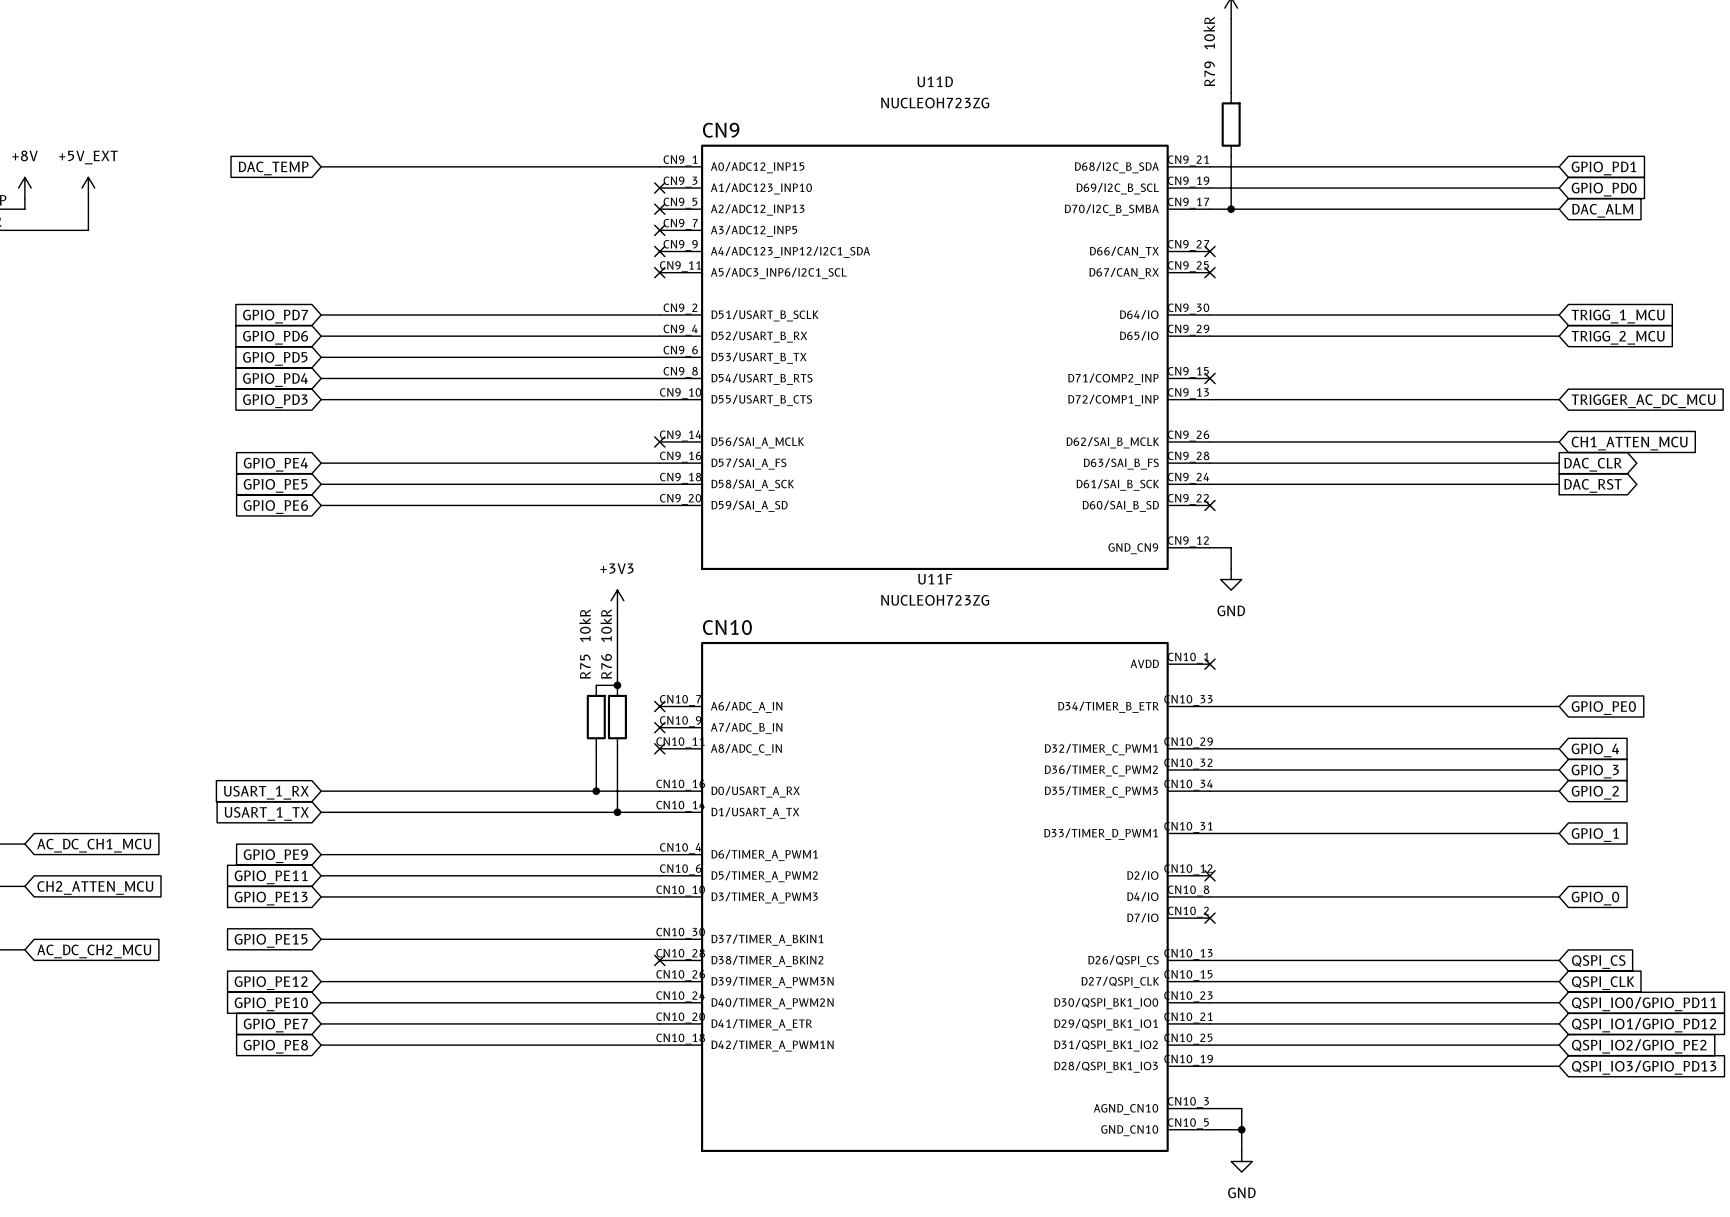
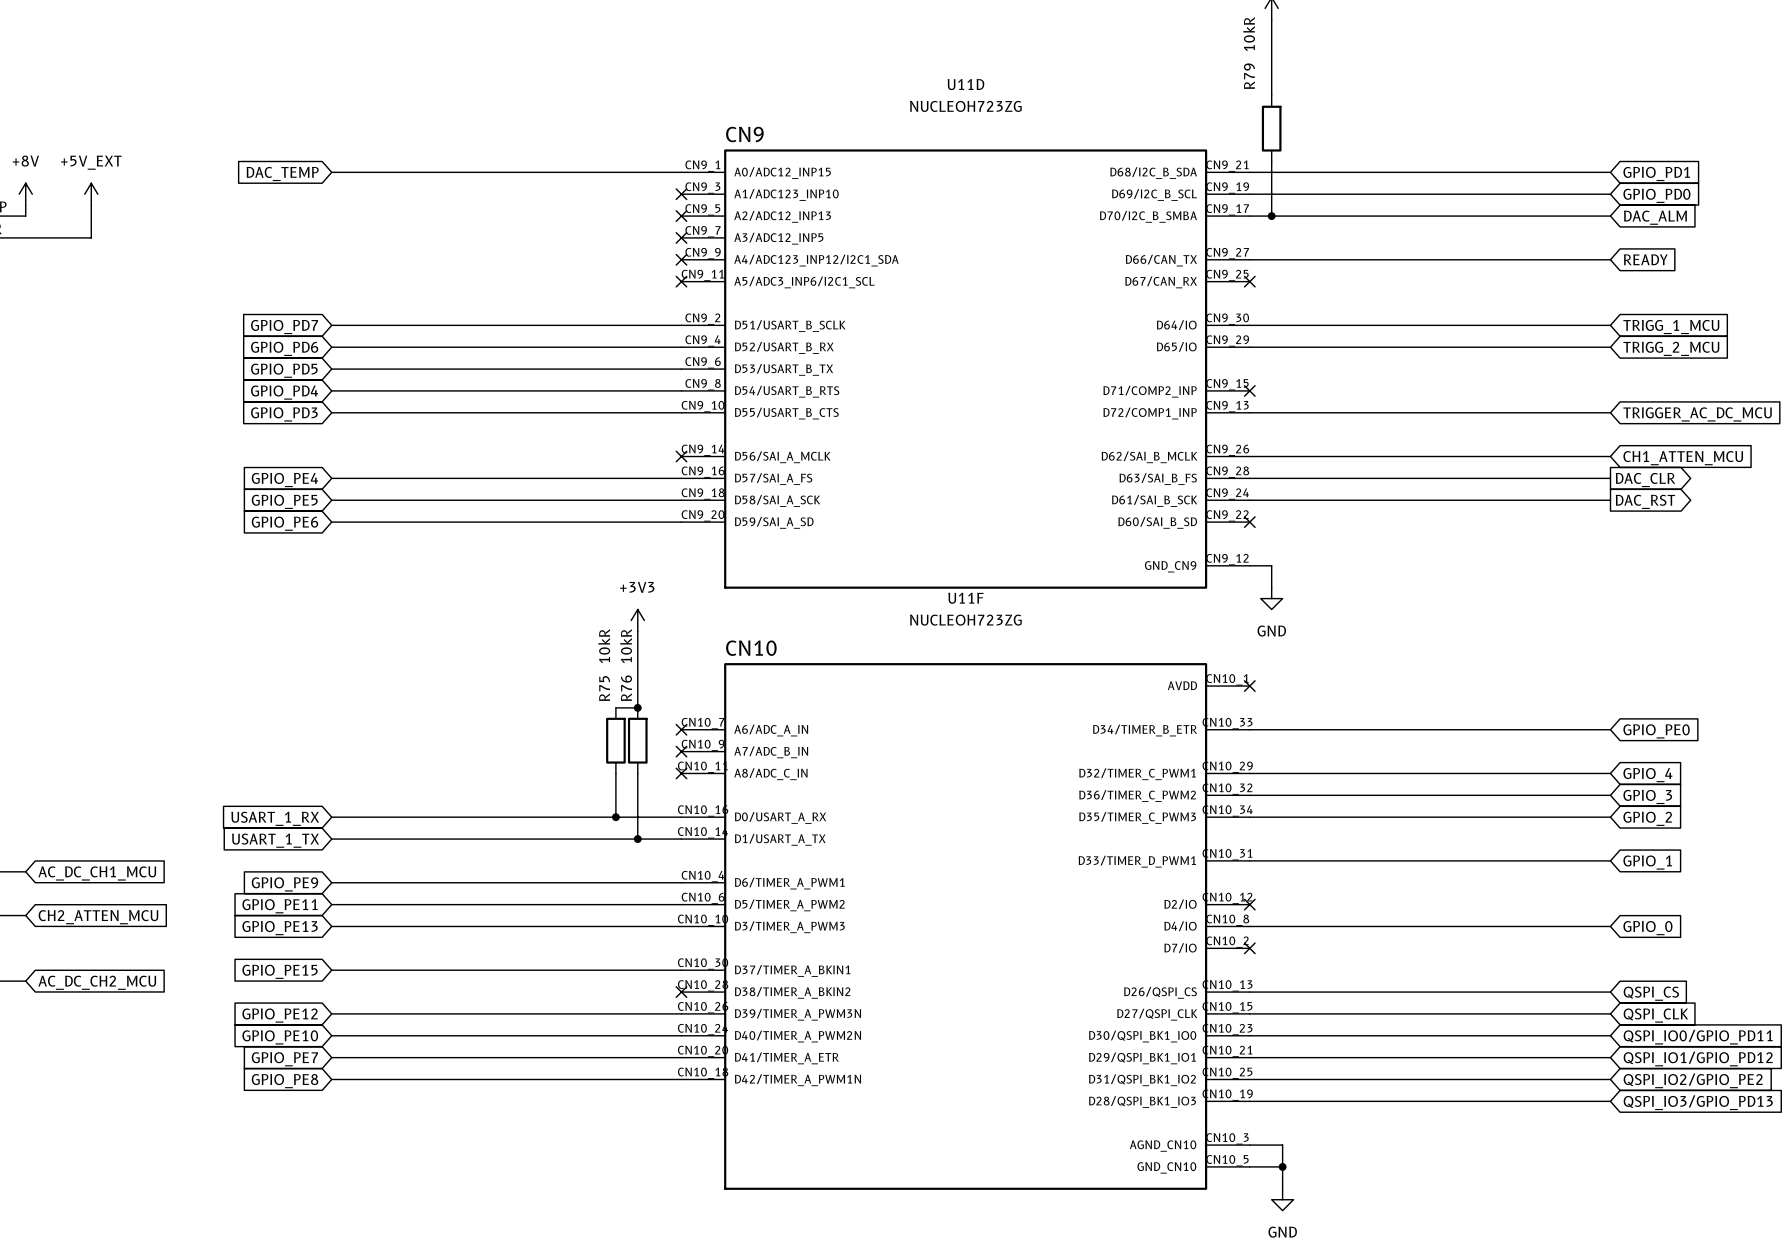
wire: none -> (1249, 259) (1610, 259)
no-connect mark: (1210, 251) -> none
global label: none -> READY (1645, 259)

